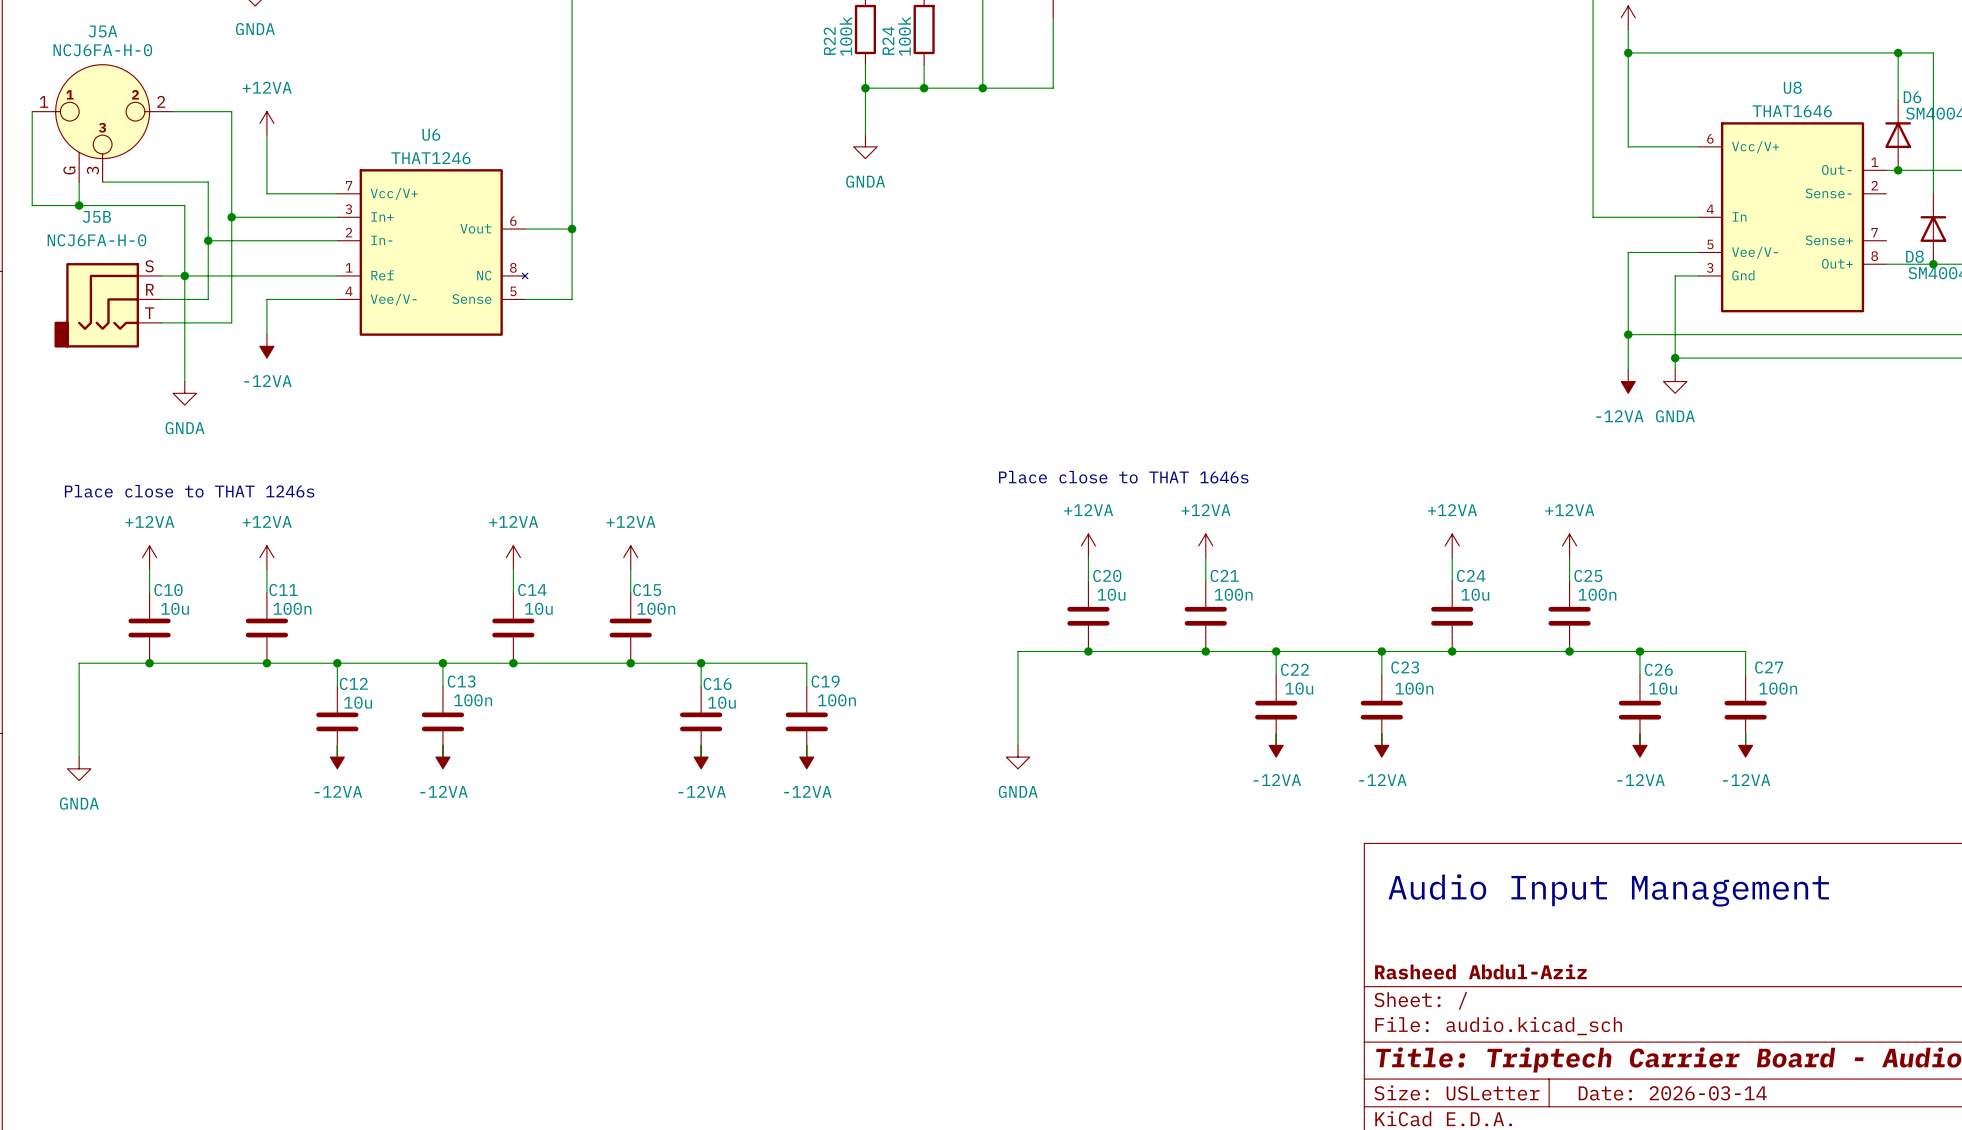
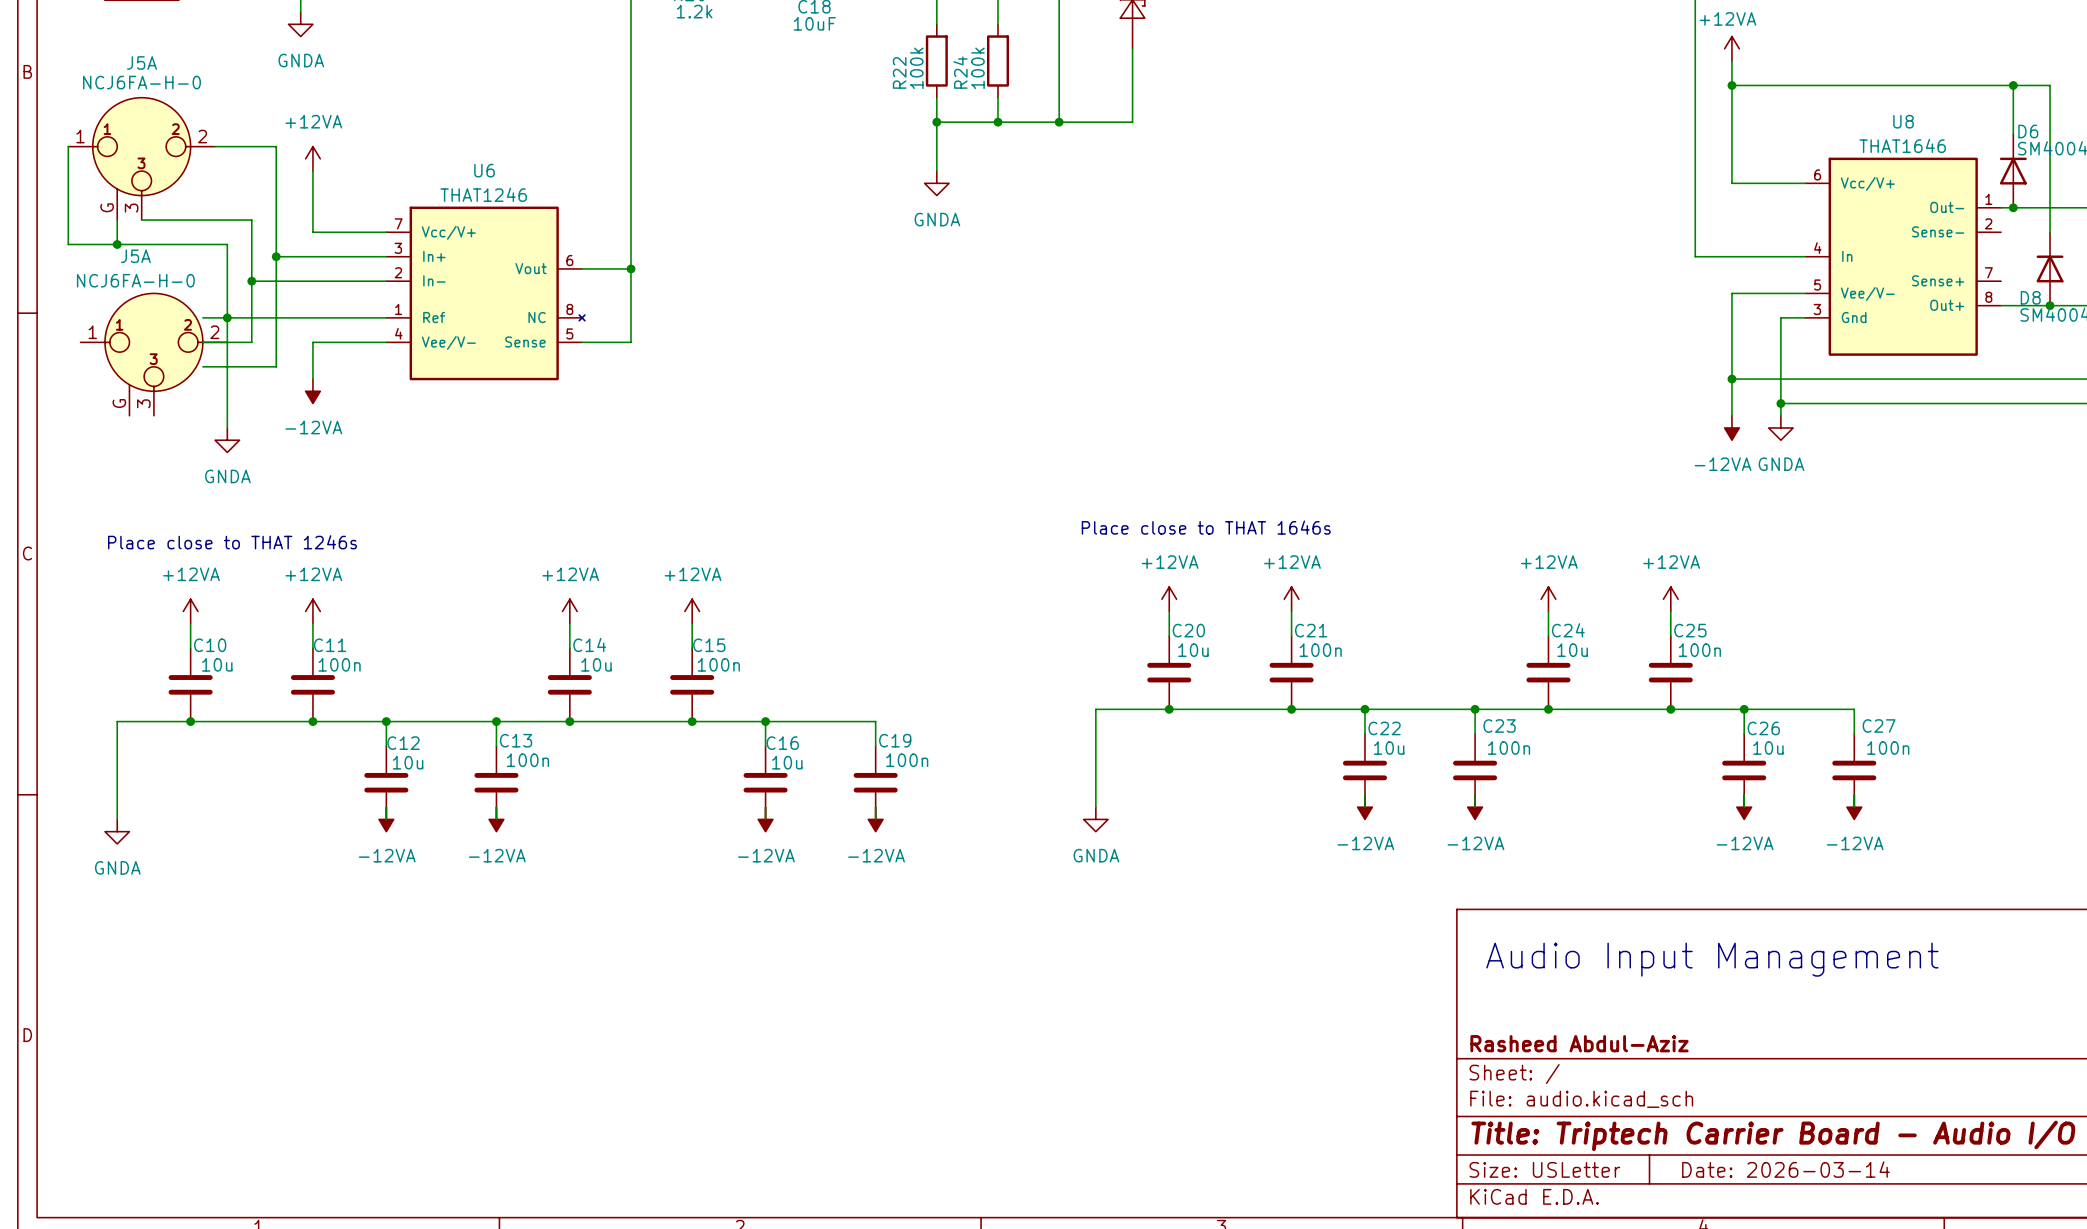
J5B: NCJ6FA-H-0 (107, 305) -> none
J5A: none -> NCJ6FA-H-0 (153, 354)

